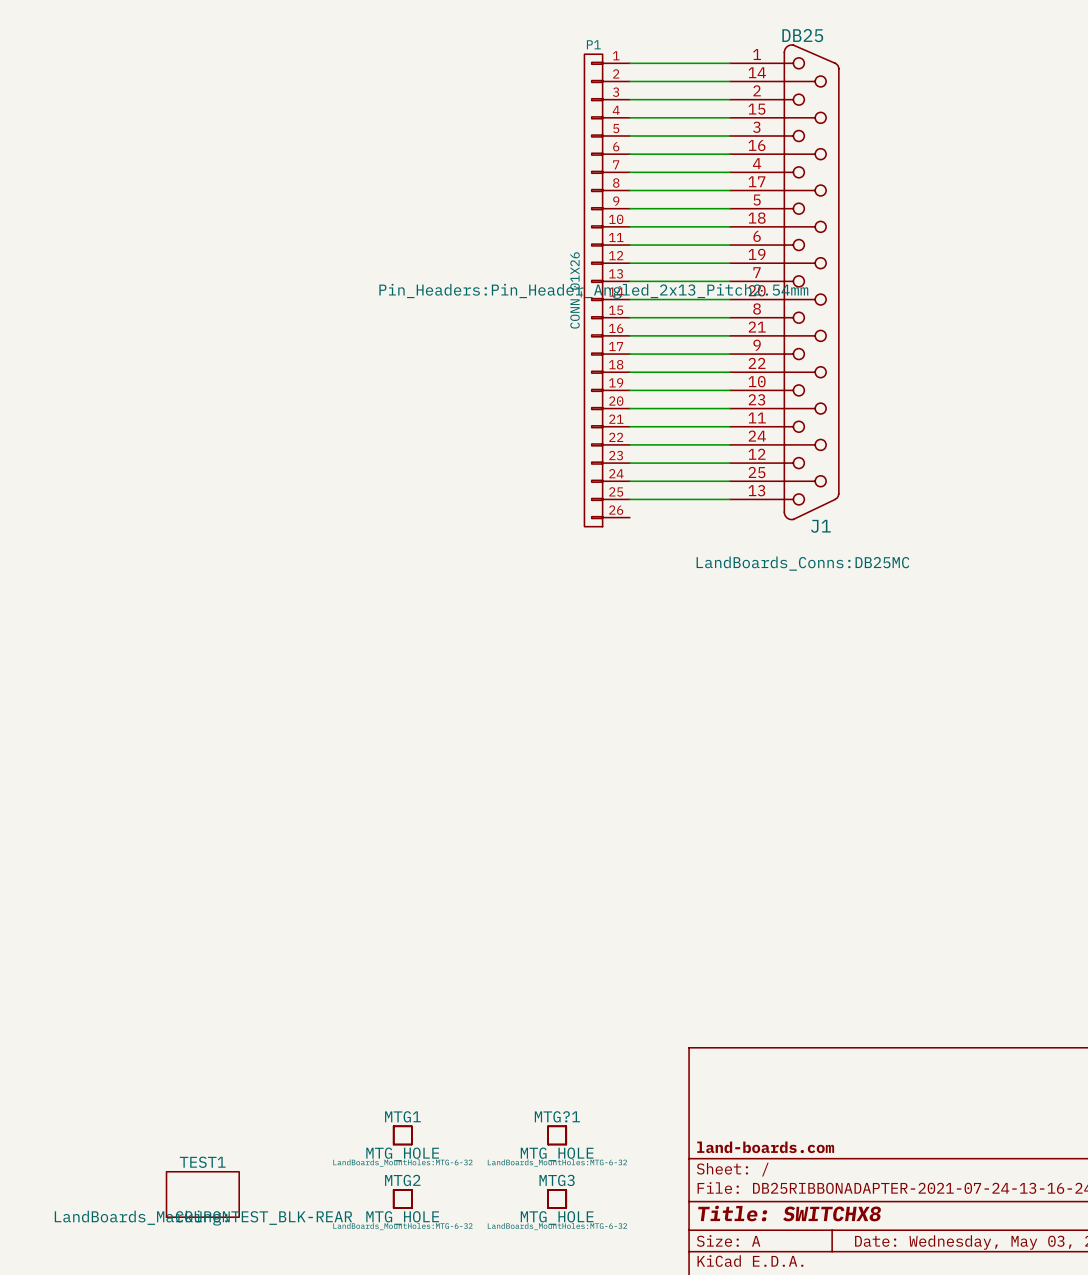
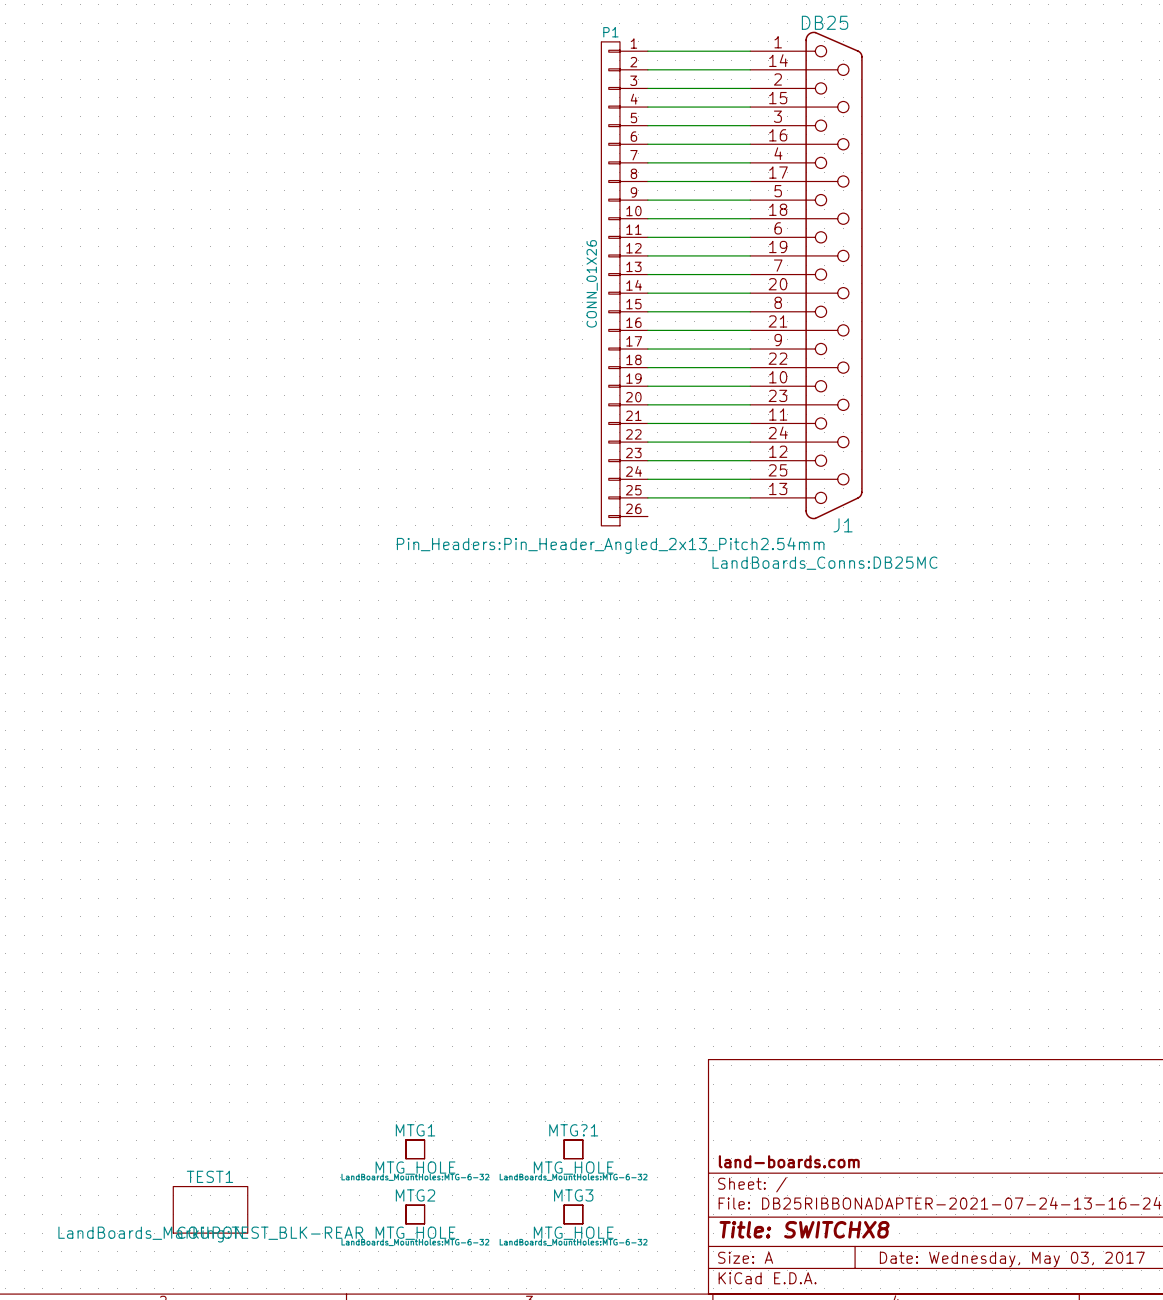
P1 text position: Pin_Headers:Pin_Header_Angled_2x13_Pitch2.54mm (593, 291) -> Pin_Headers:Pin_Header_Angled_2x13_Pitch2.54mm (610, 545)

